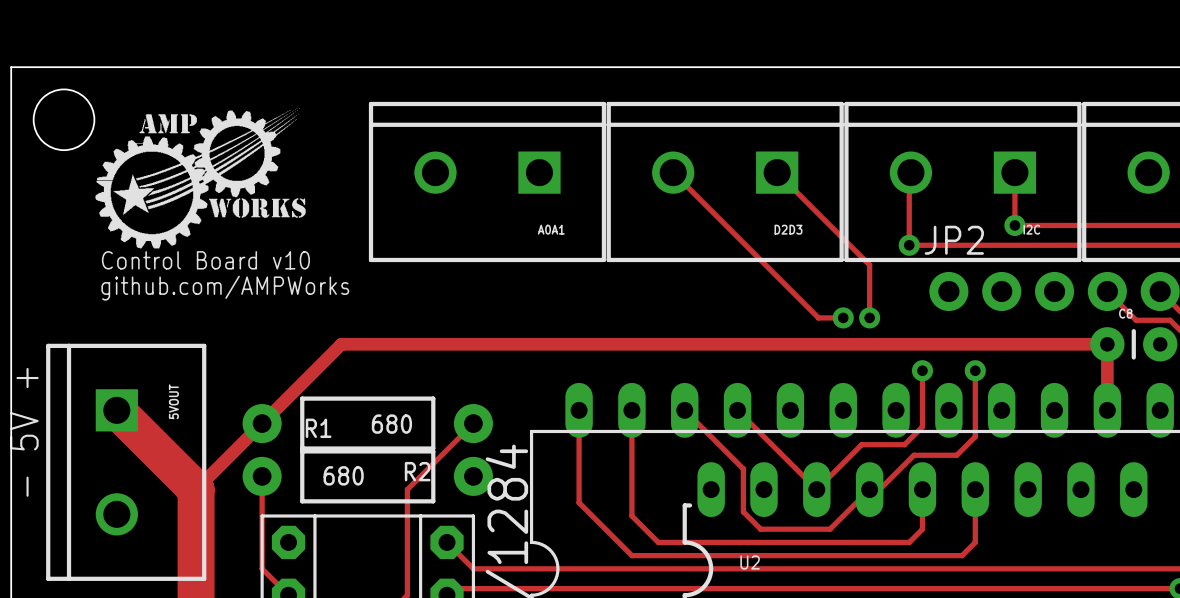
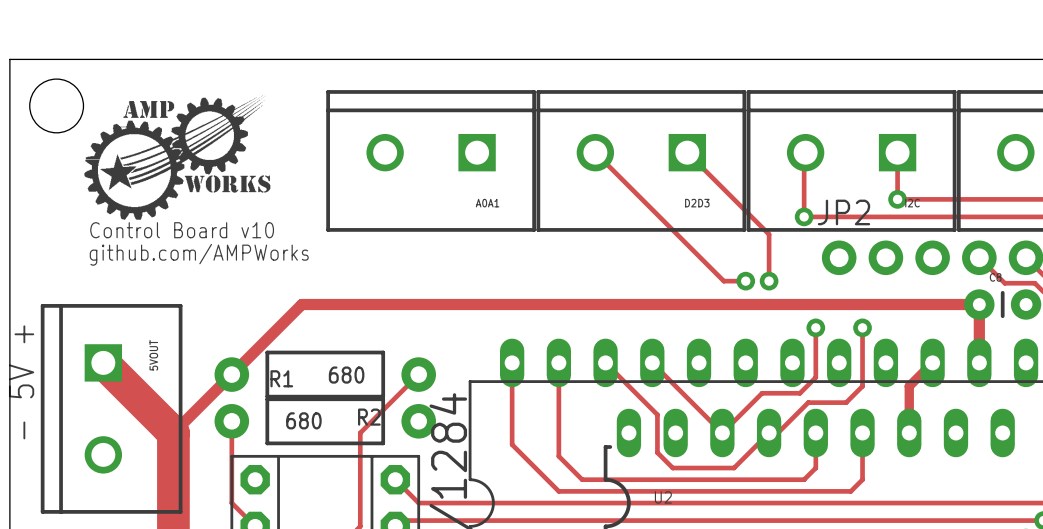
track: none -> (932, 362) (909, 386) (909, 432)

